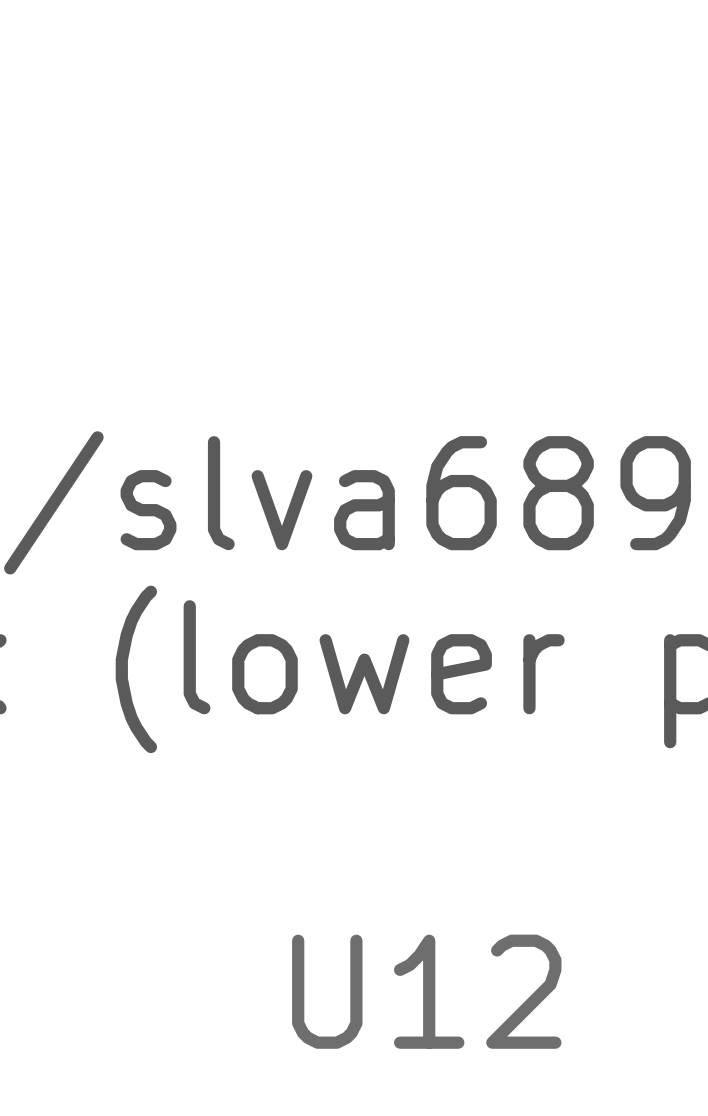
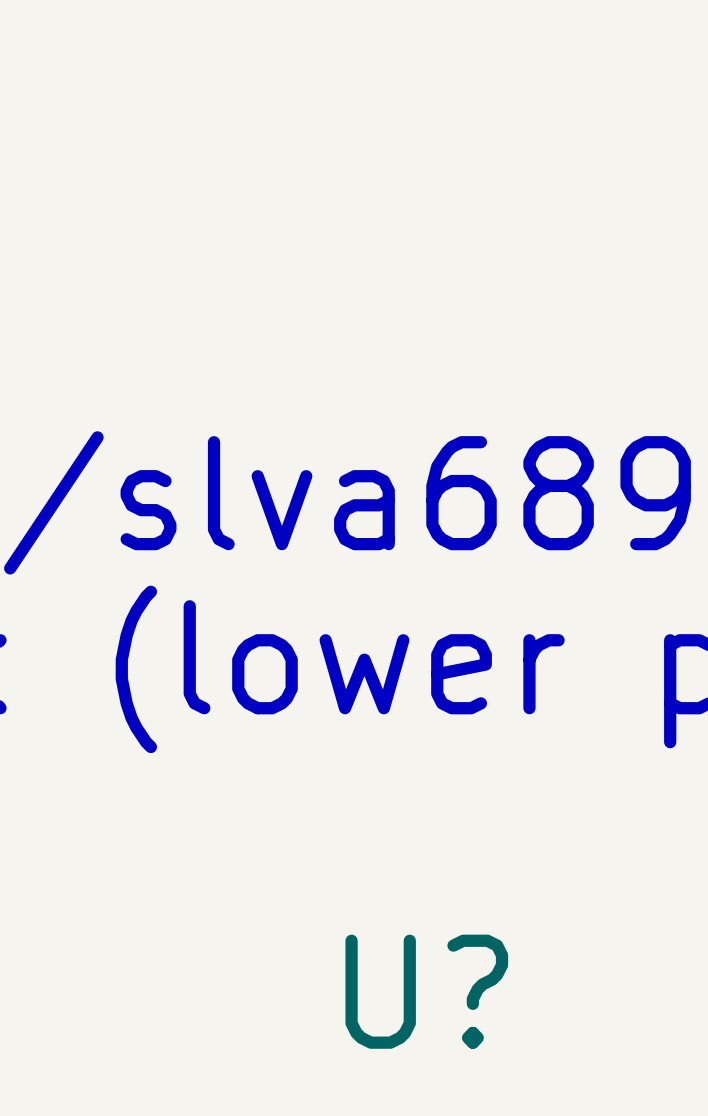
U12 name: U12 (426, 991) -> U? (426, 991)

